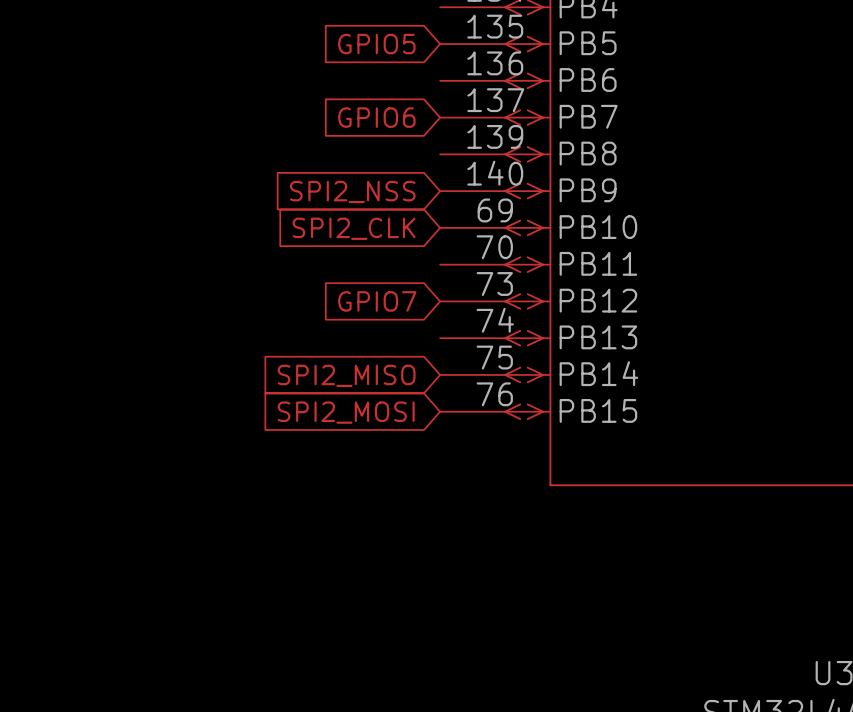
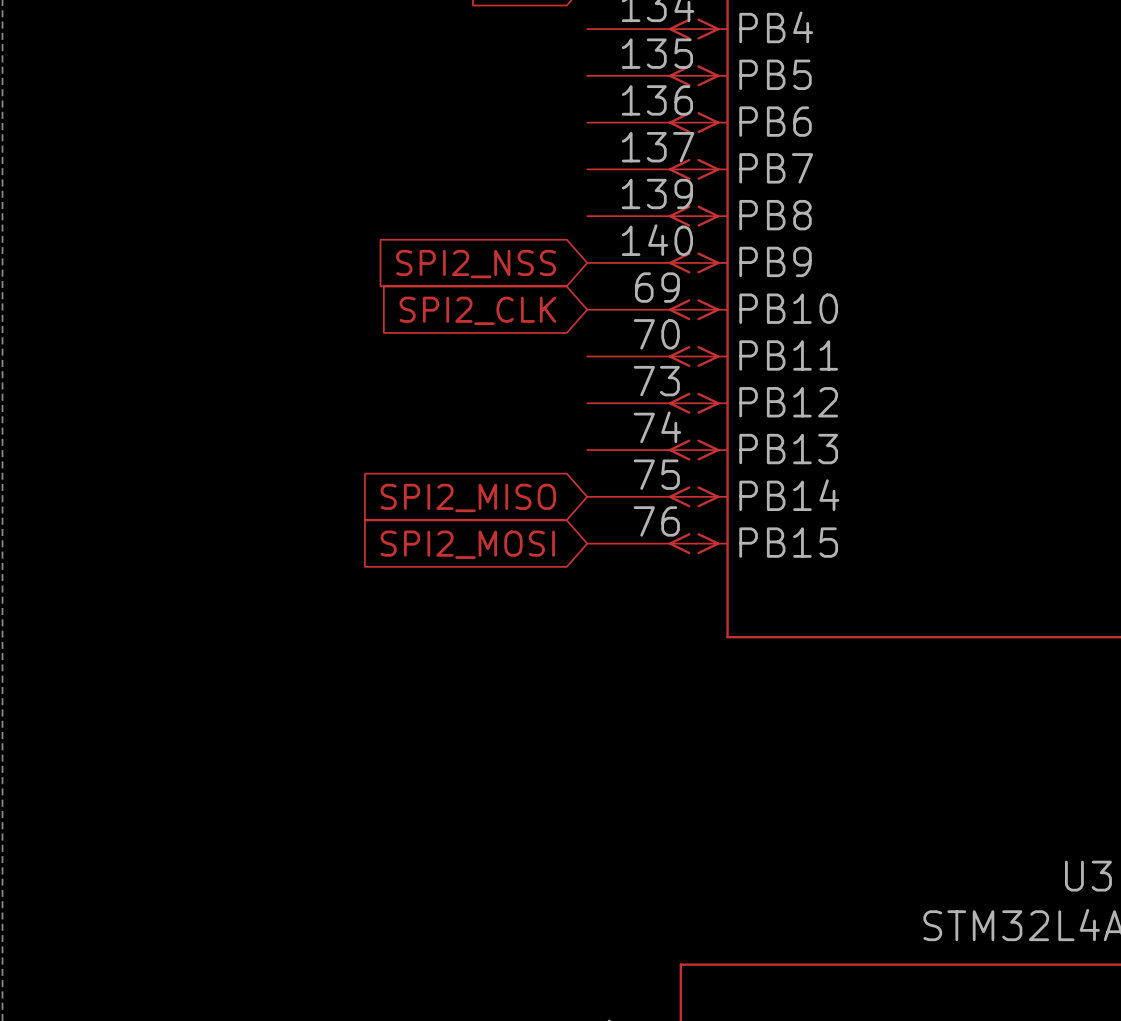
global label: GPIO5 (376, 44) -> none
global label: GPIO6 (376, 117) -> none
global label: GPIO7 (377, 301) -> none

